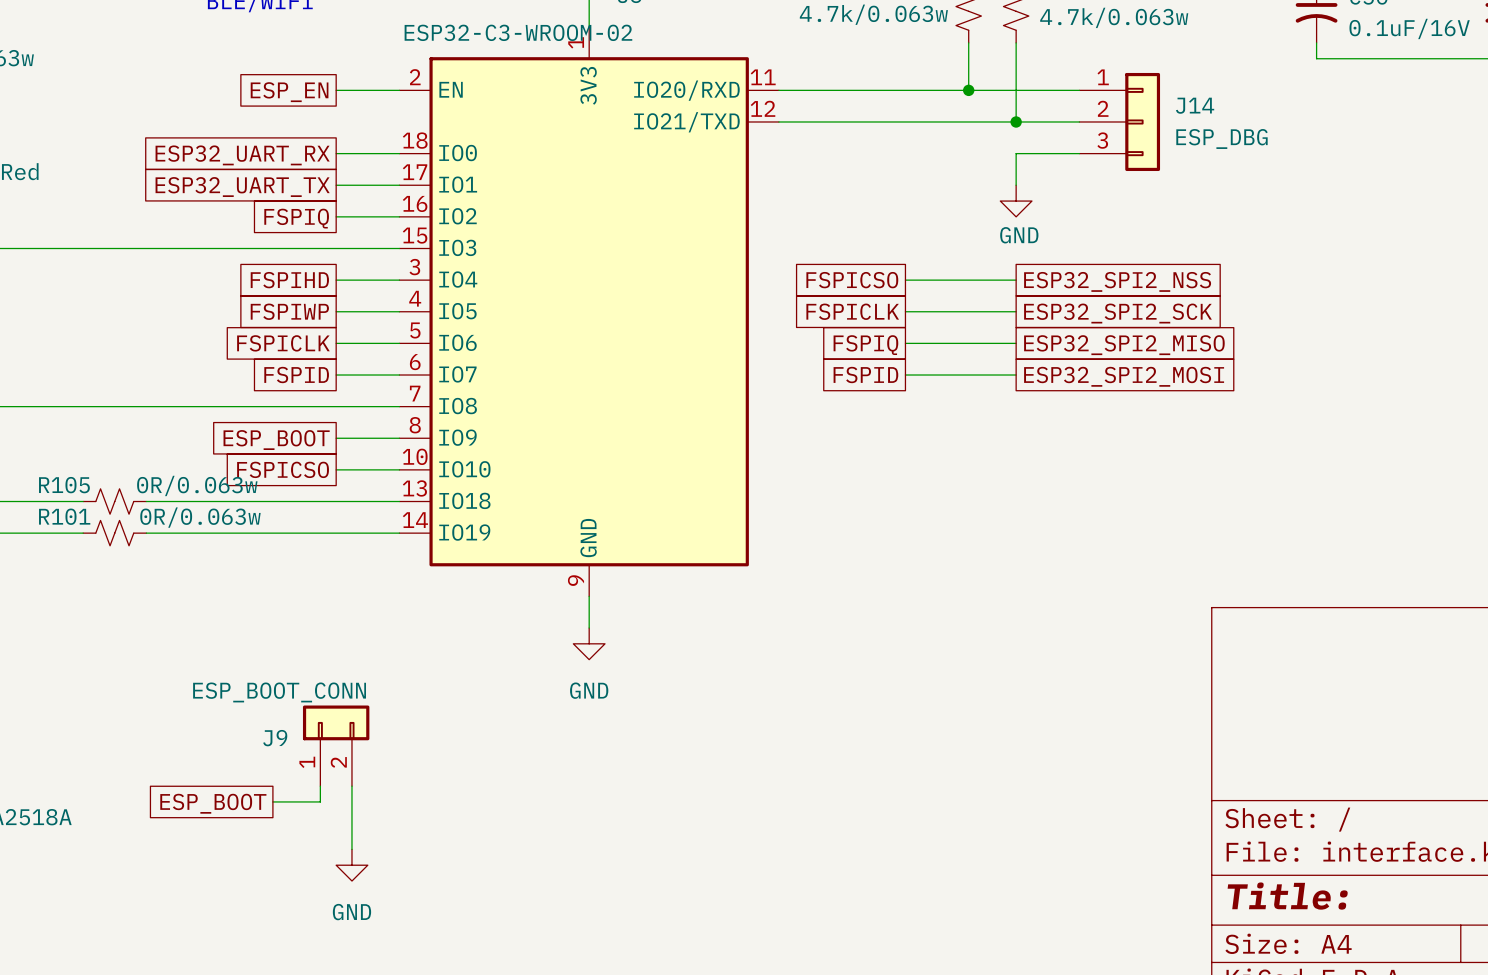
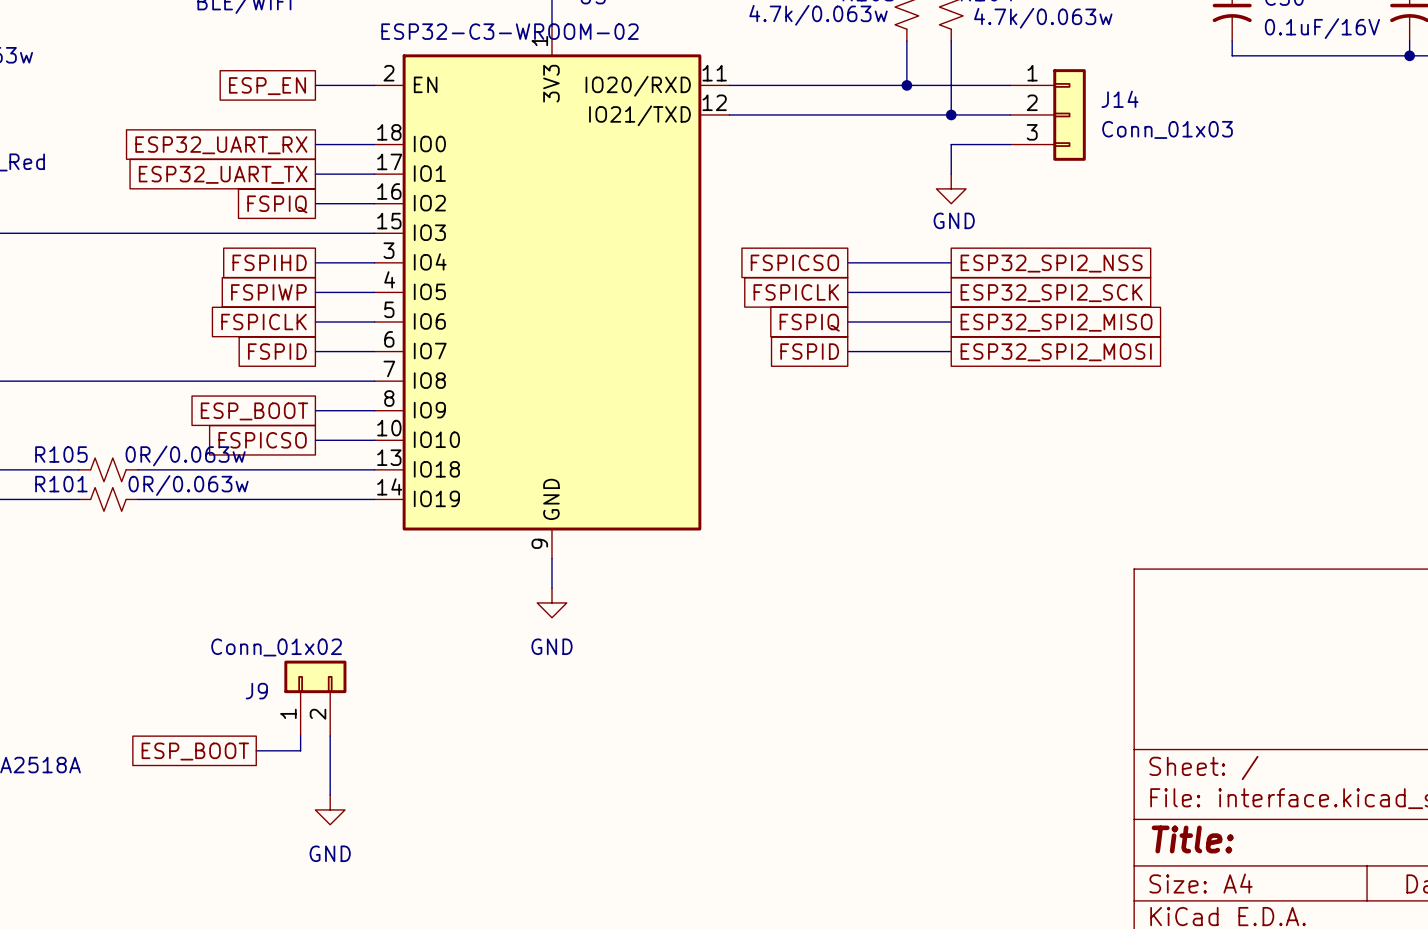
J14 value: ESP_DBG (1221, 138) -> Conn_01x03 (1167, 129)
J9 value: ESP_BOOT_CONN (279, 692) -> Conn_01x02 (276, 647)

